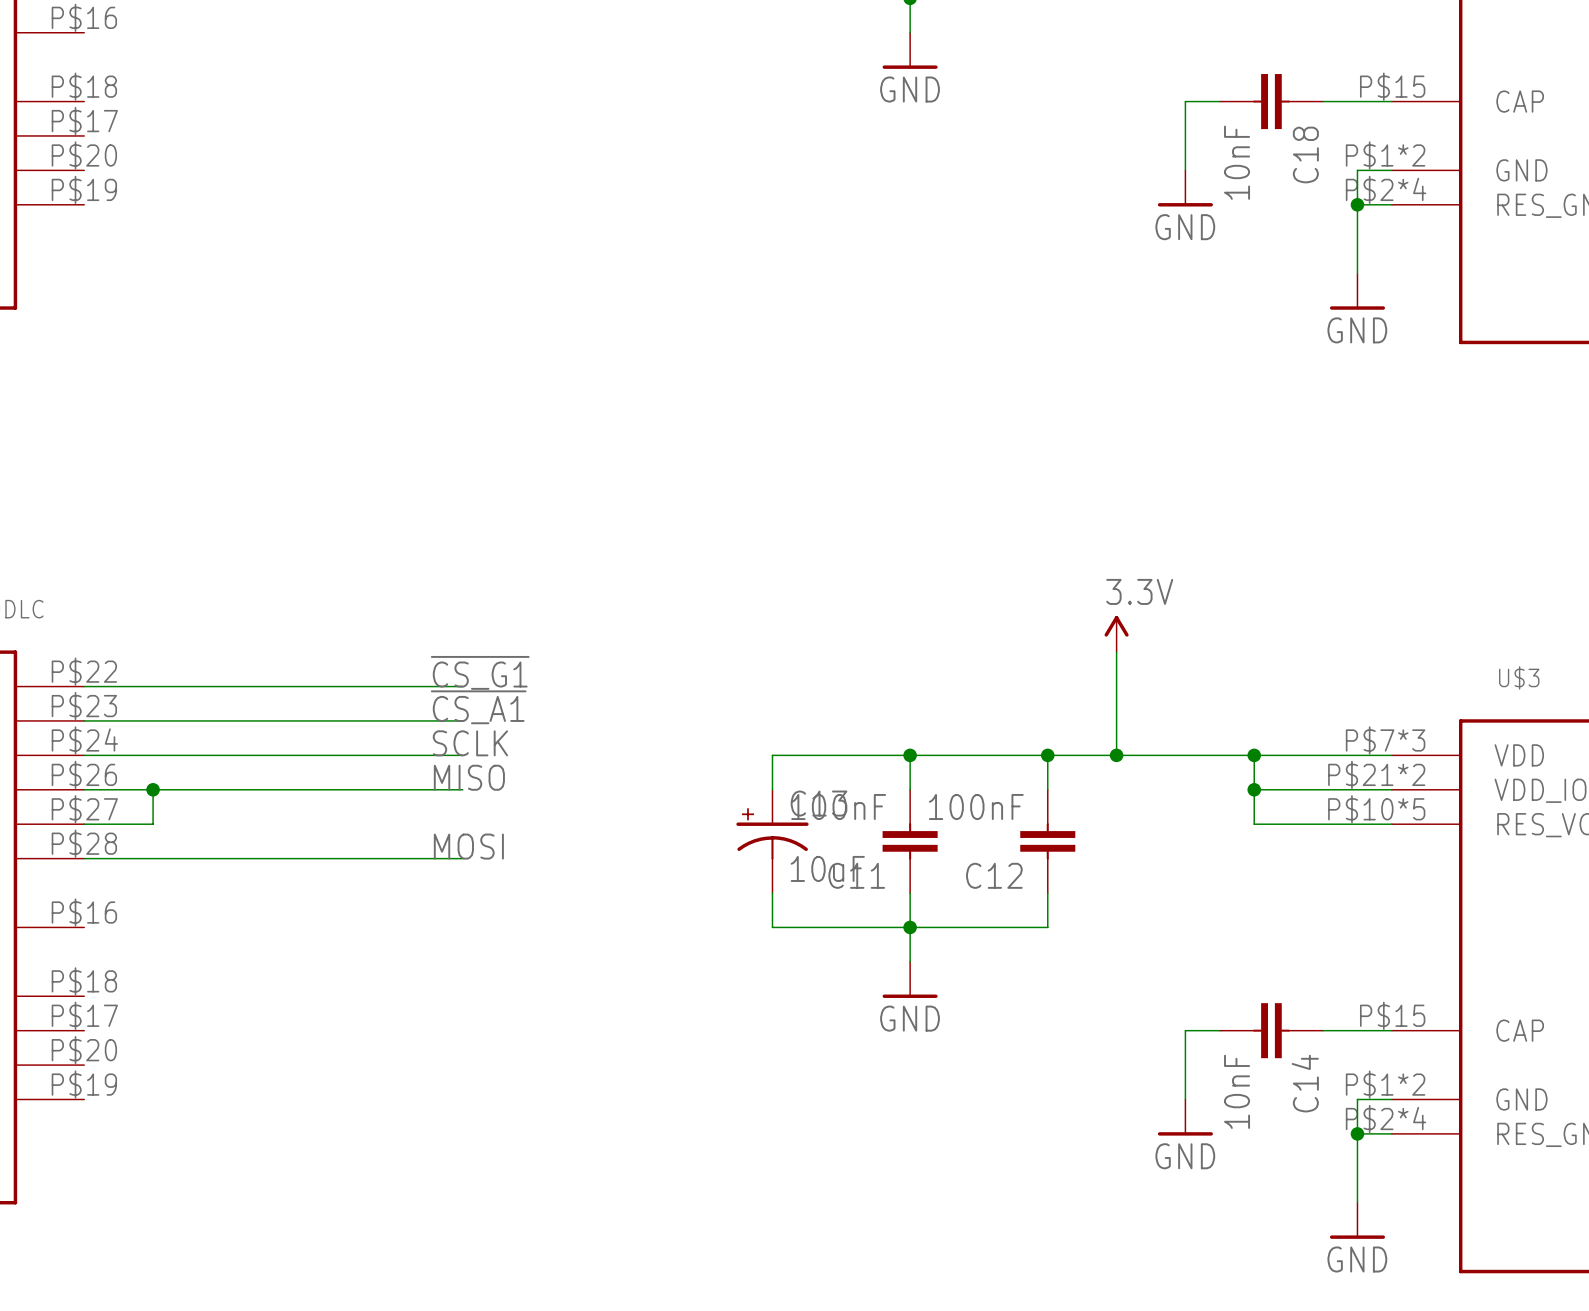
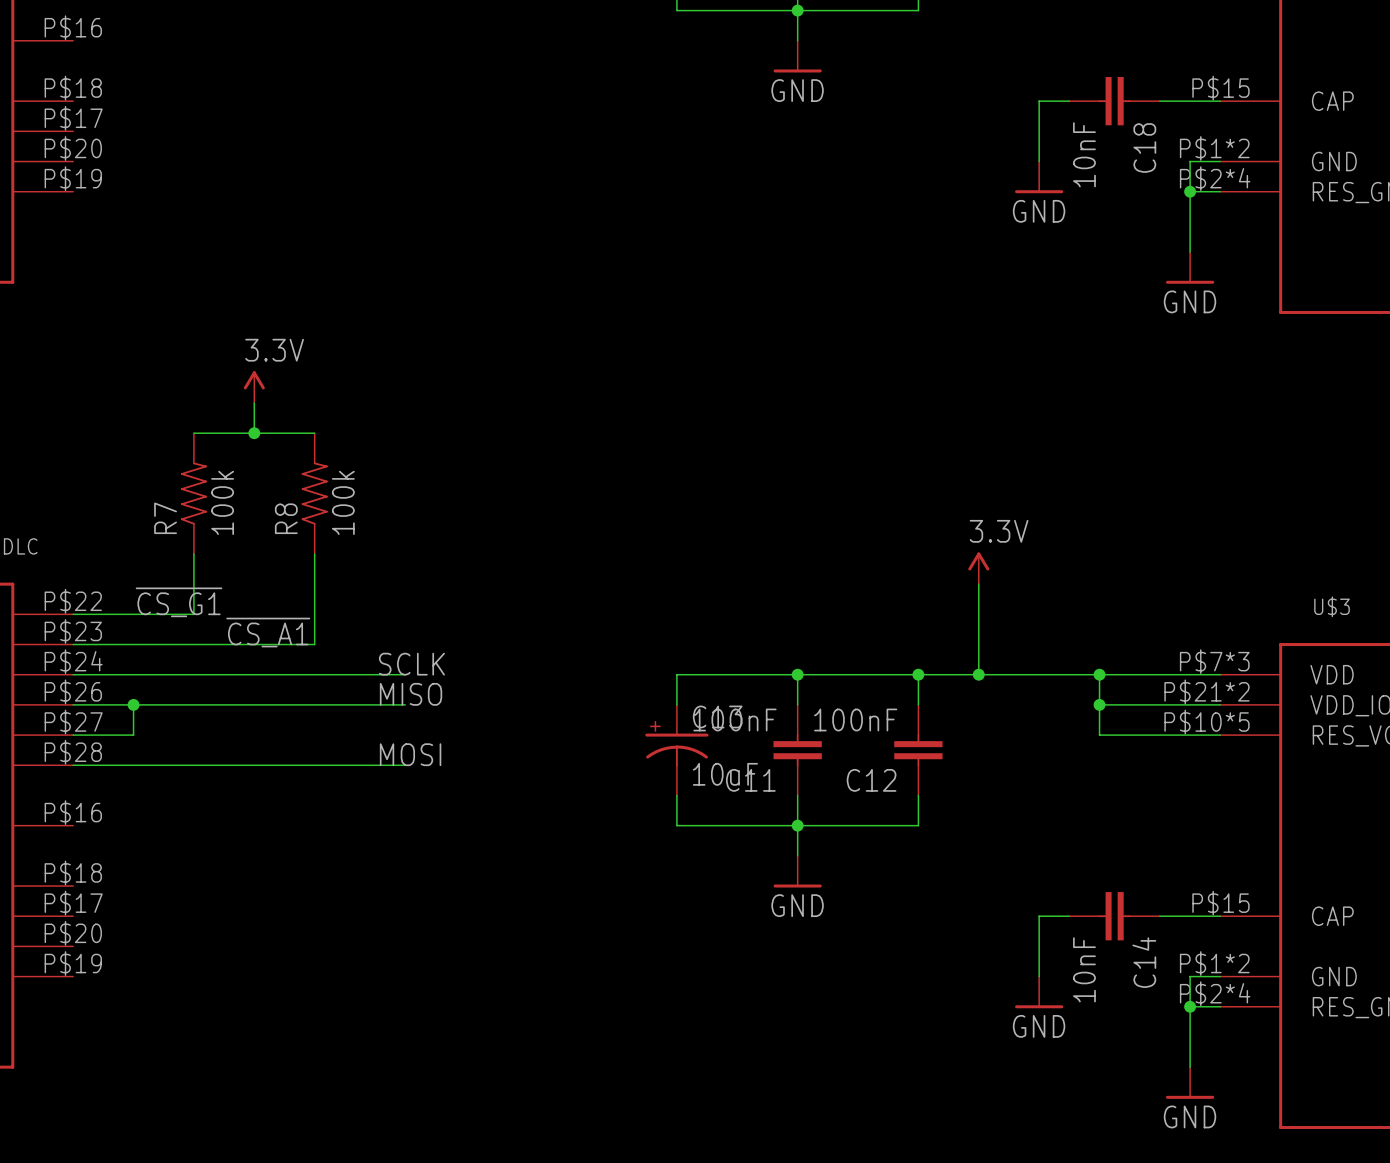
power symbol: none -> 3.3V (254, 387)
wire: none -> (254, 403) (254, 433)
wire: none -> (193, 433) (314, 433)
junction: none -> (254, 433)
R7: none -> 100k (193, 493)
R8: none -> 100k (314, 493)
label position: ~{CS_G1} (480, 672) -> ~{CS_G1} (179, 602)
wire: (221, 686) (462, 686) -> (193, 614) (193, 553)
label position: ~{CS_A1} (478, 707) -> ~{CS_A1} (268, 632)
wire: (359, 720) (462, 720) -> (314, 644) (314, 553)

